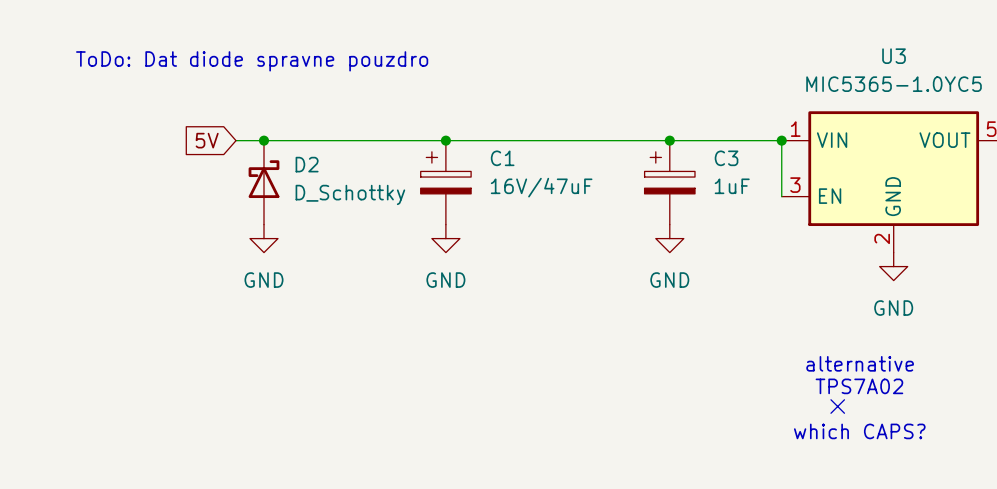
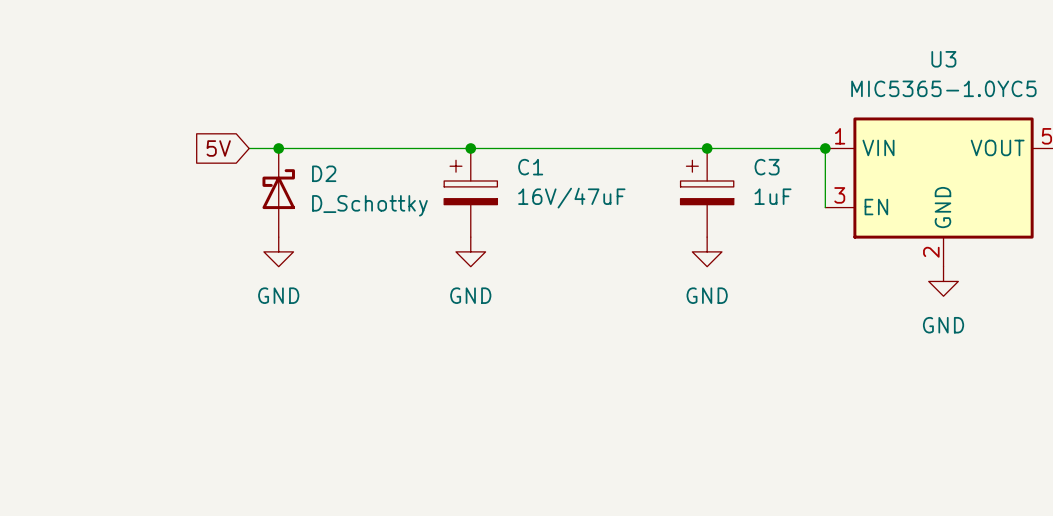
text: ToDo: Dat diode spravne pouzdro (252, 61) -> none
text: alternative (860, 363) -> none
text: TPS7A02 (859, 386) -> none
no-connect mark: (837, 406) -> none
text: which CAPS? (859, 431) -> none

